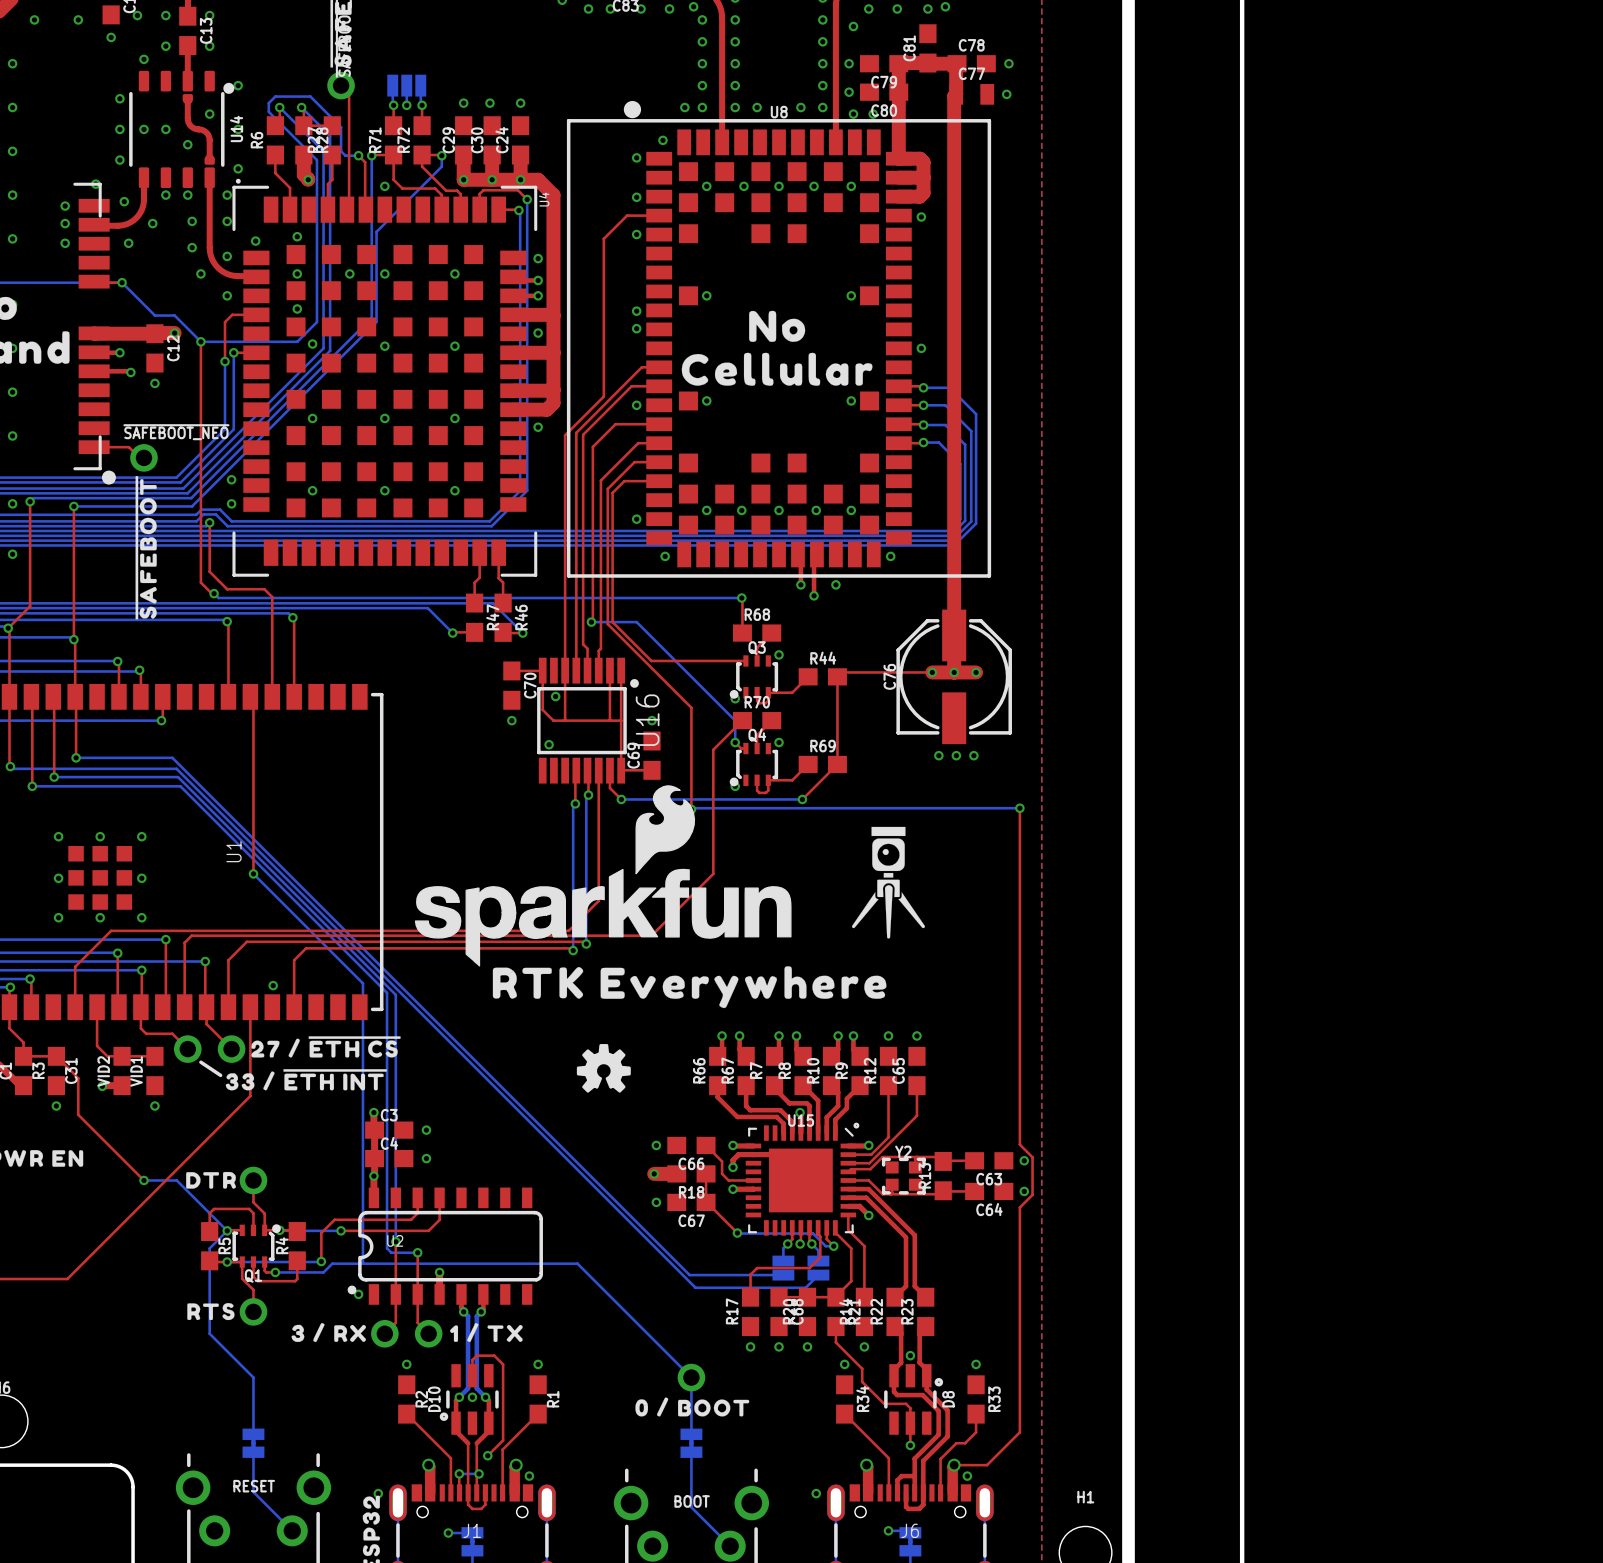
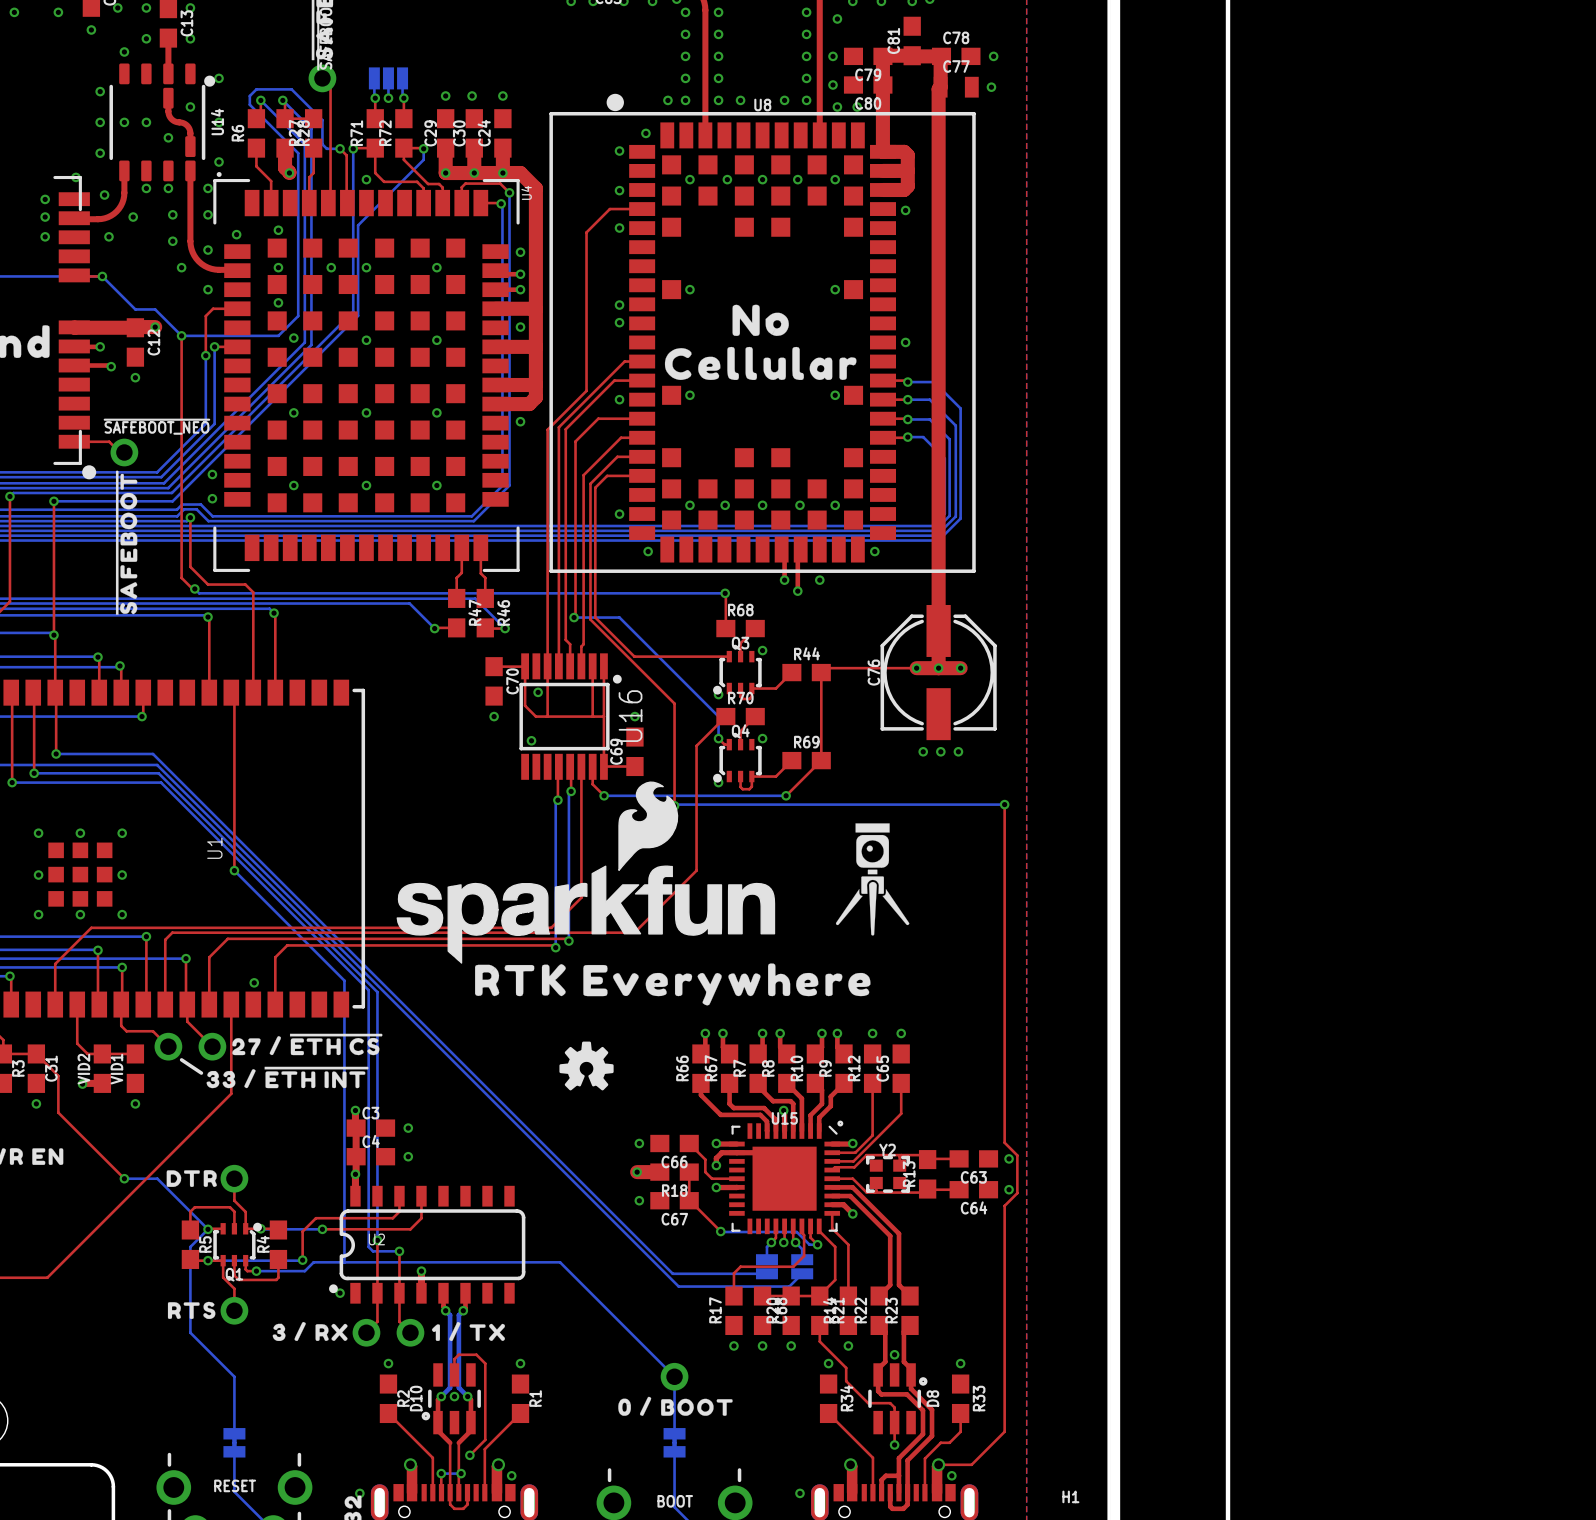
part footprint: [182, 94, 193, 105] -> [163, 87, 174, 109]
part footprint: [204, 154, 215, 165] -> [185, 136, 196, 158]

